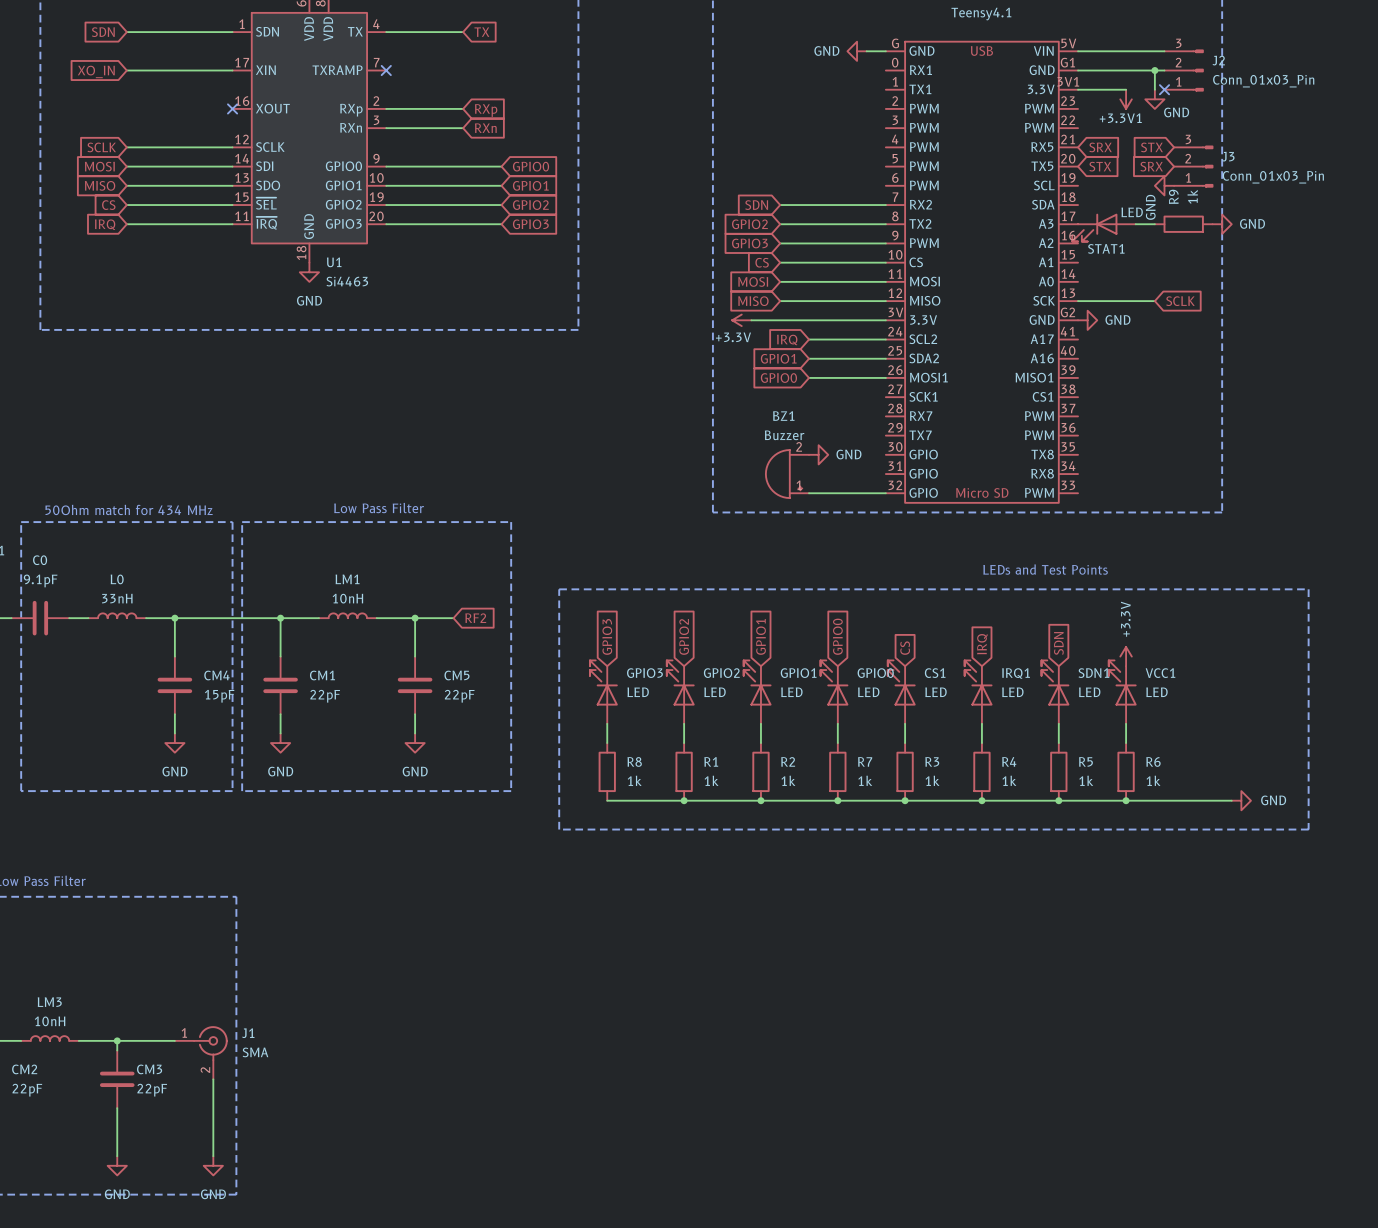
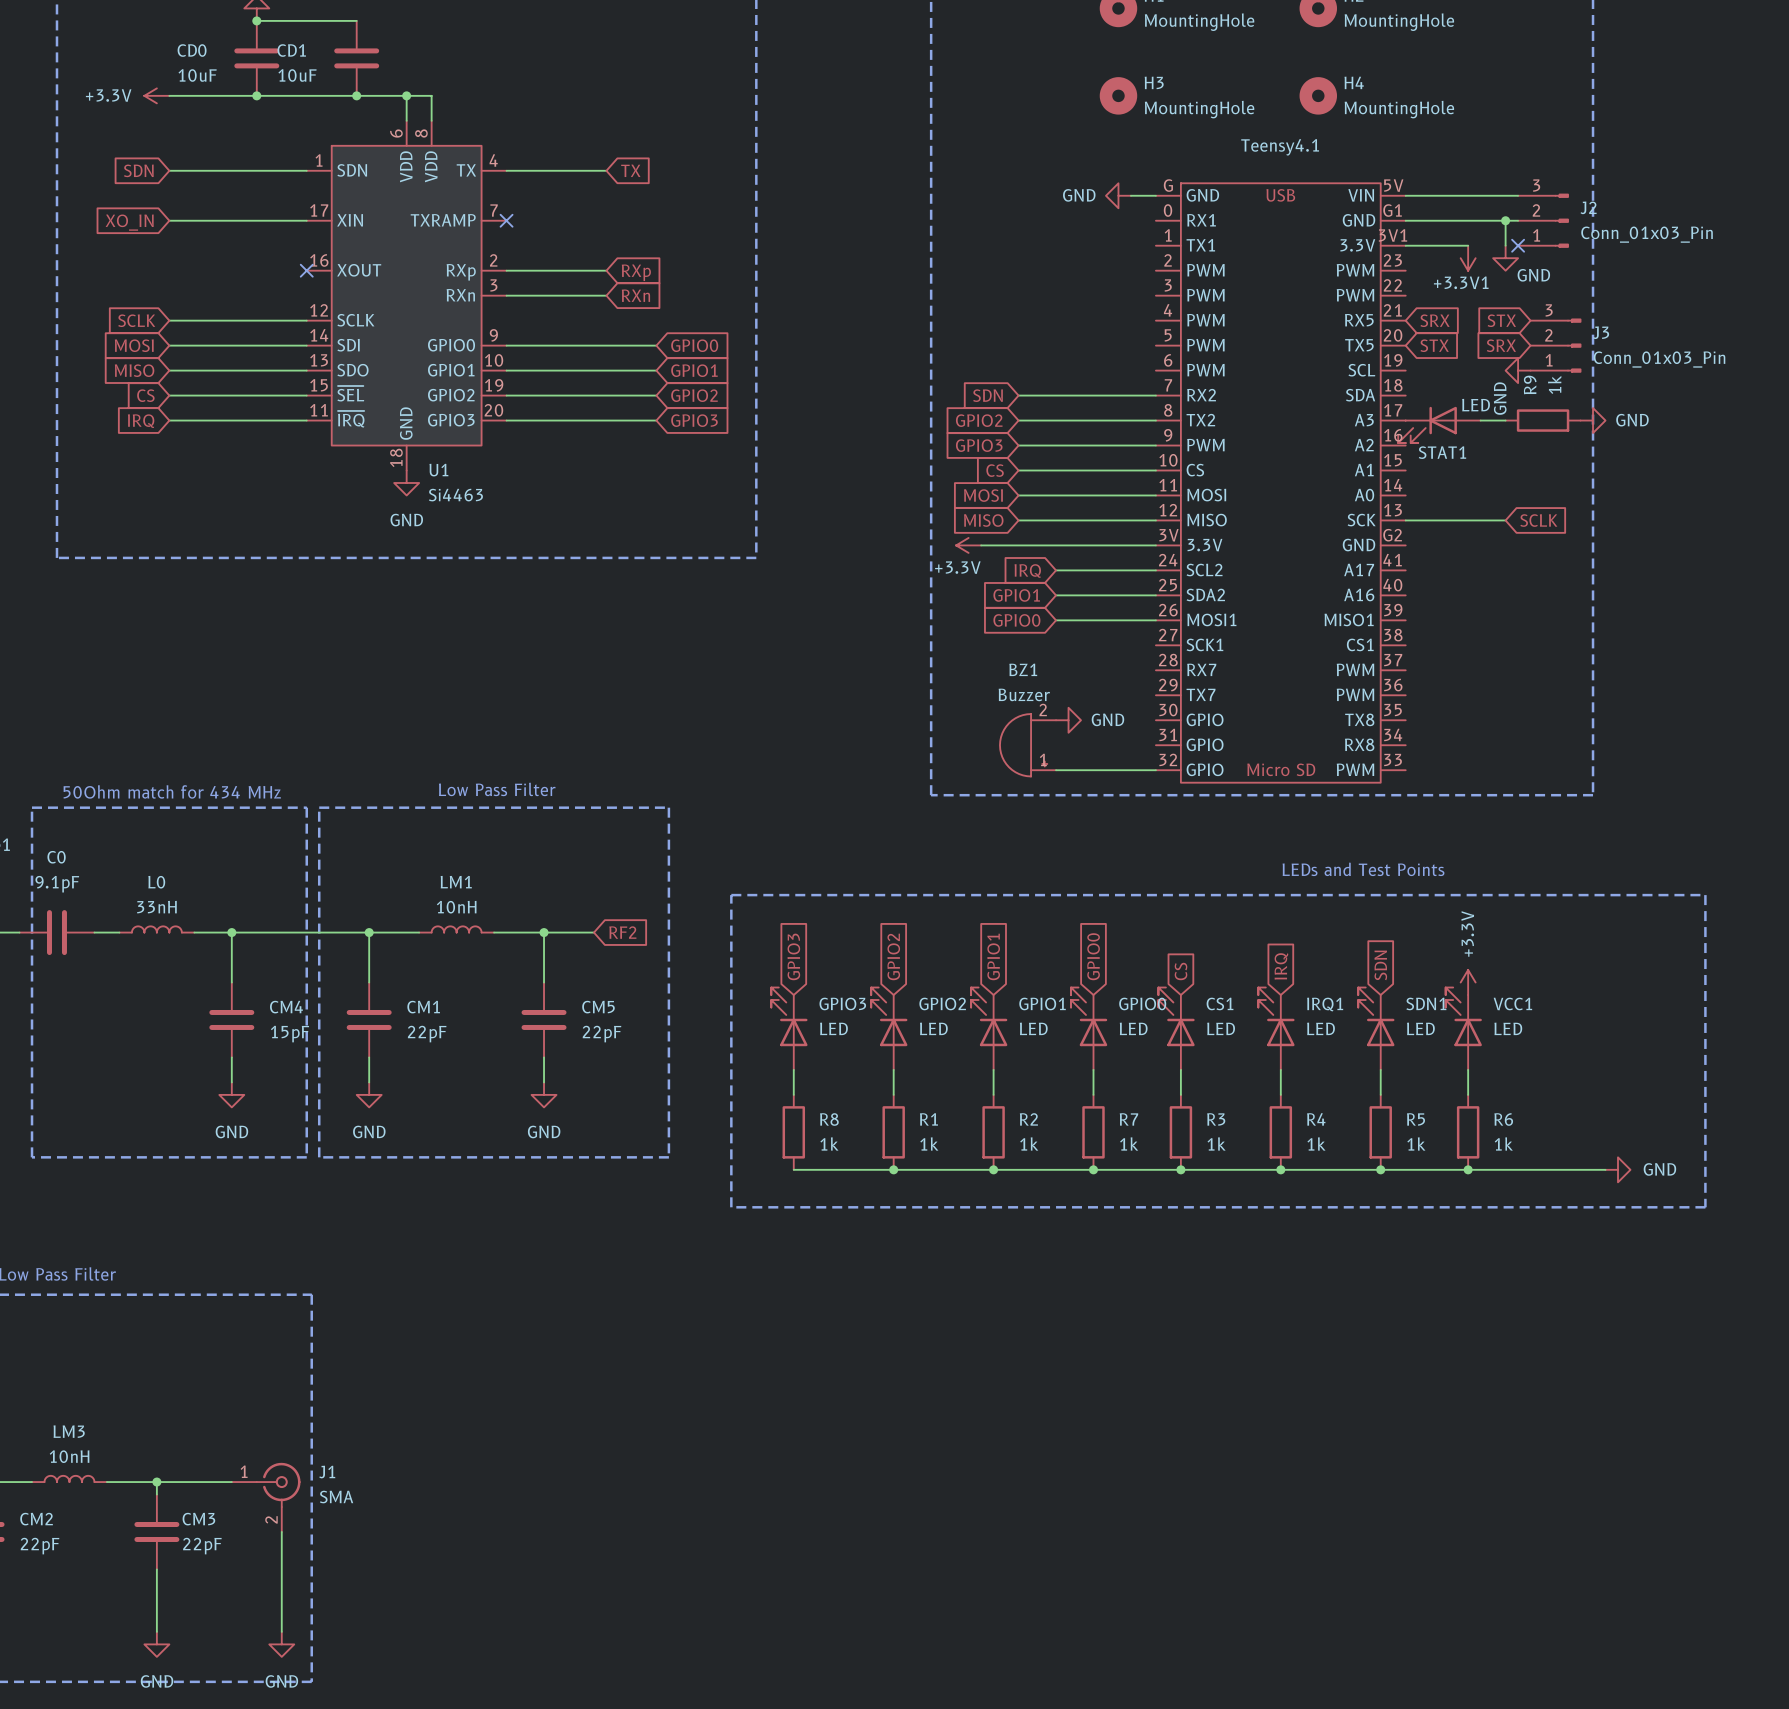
power symbol: GND (1087, 320) -> none

